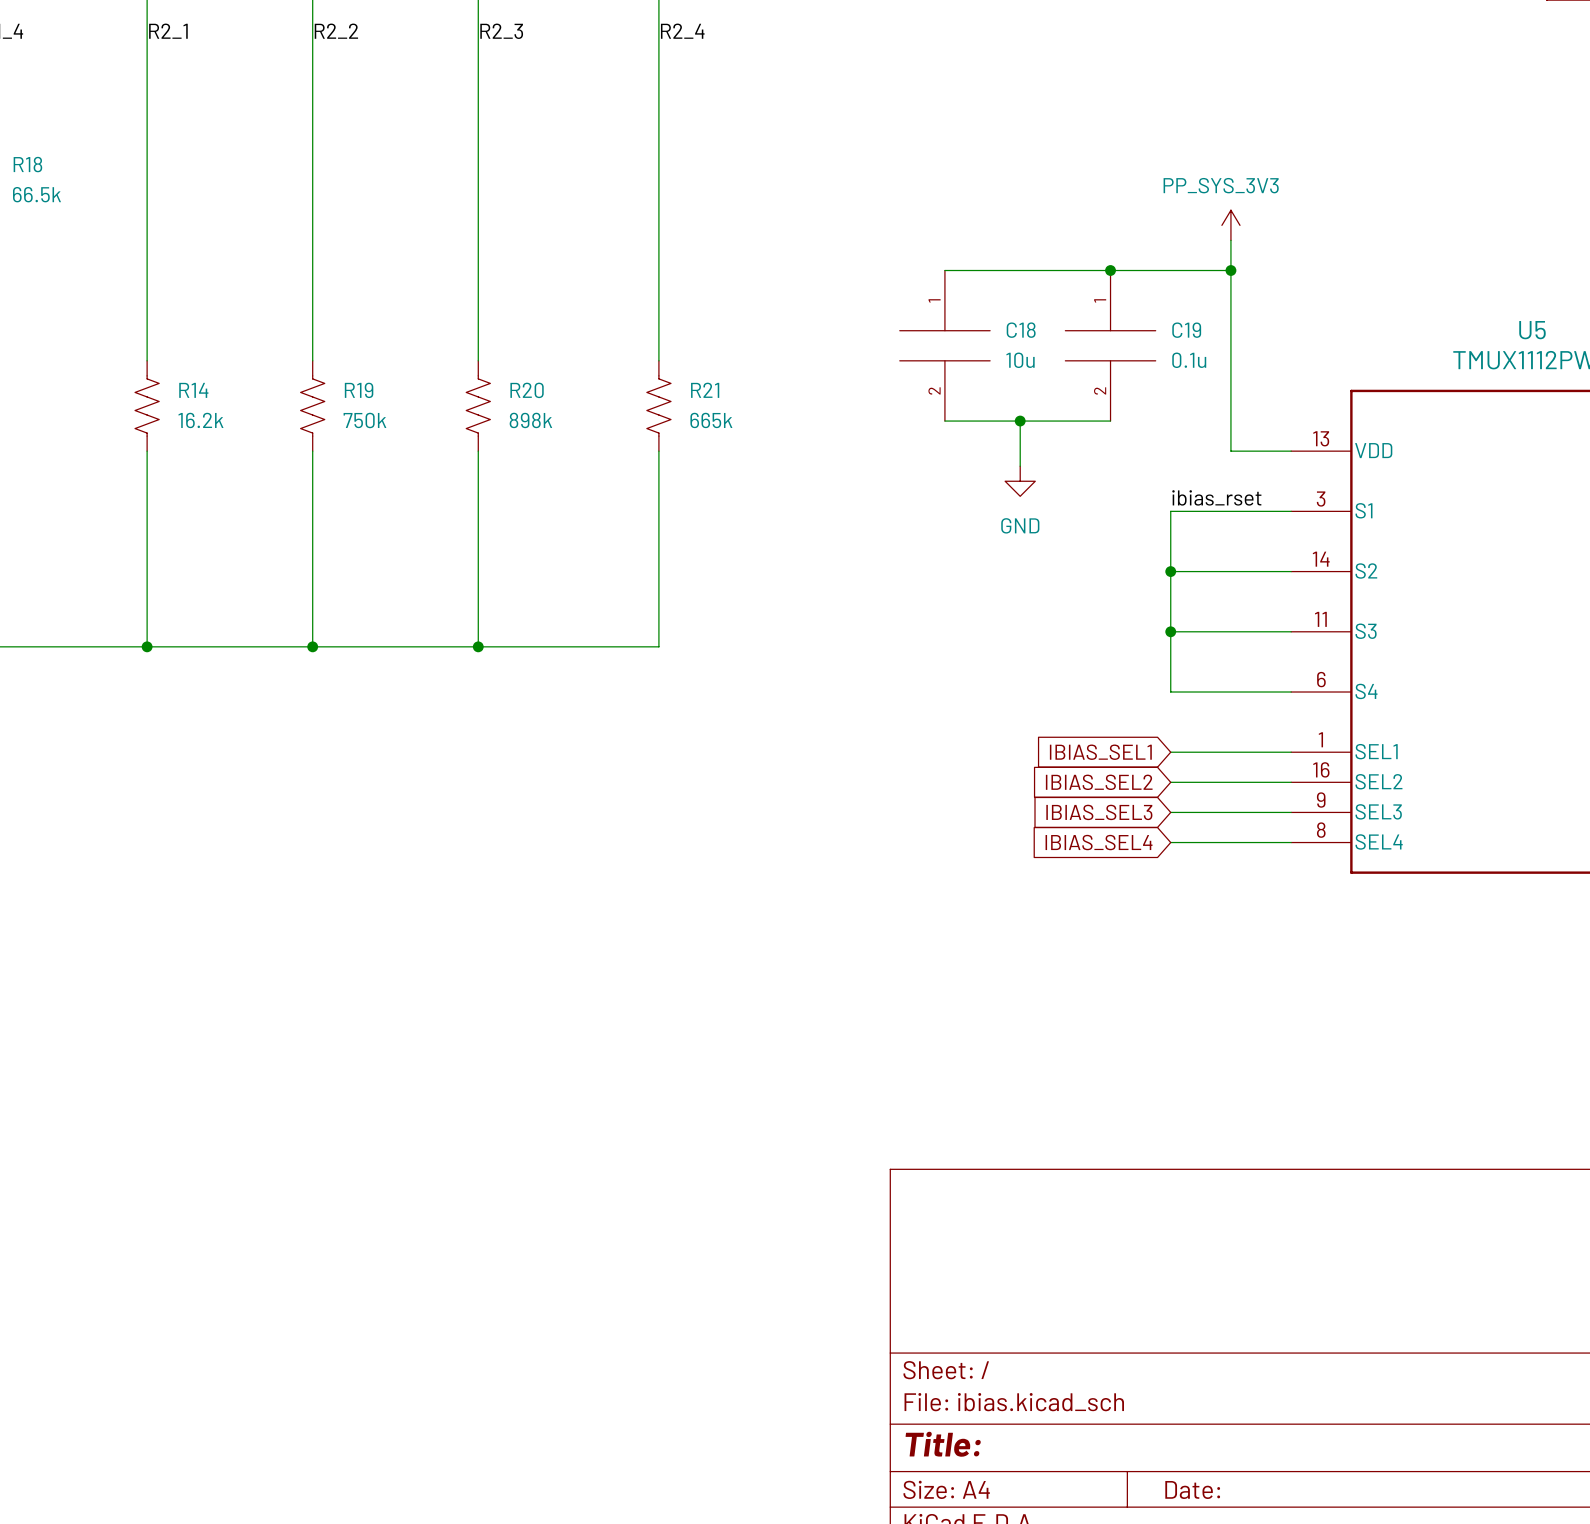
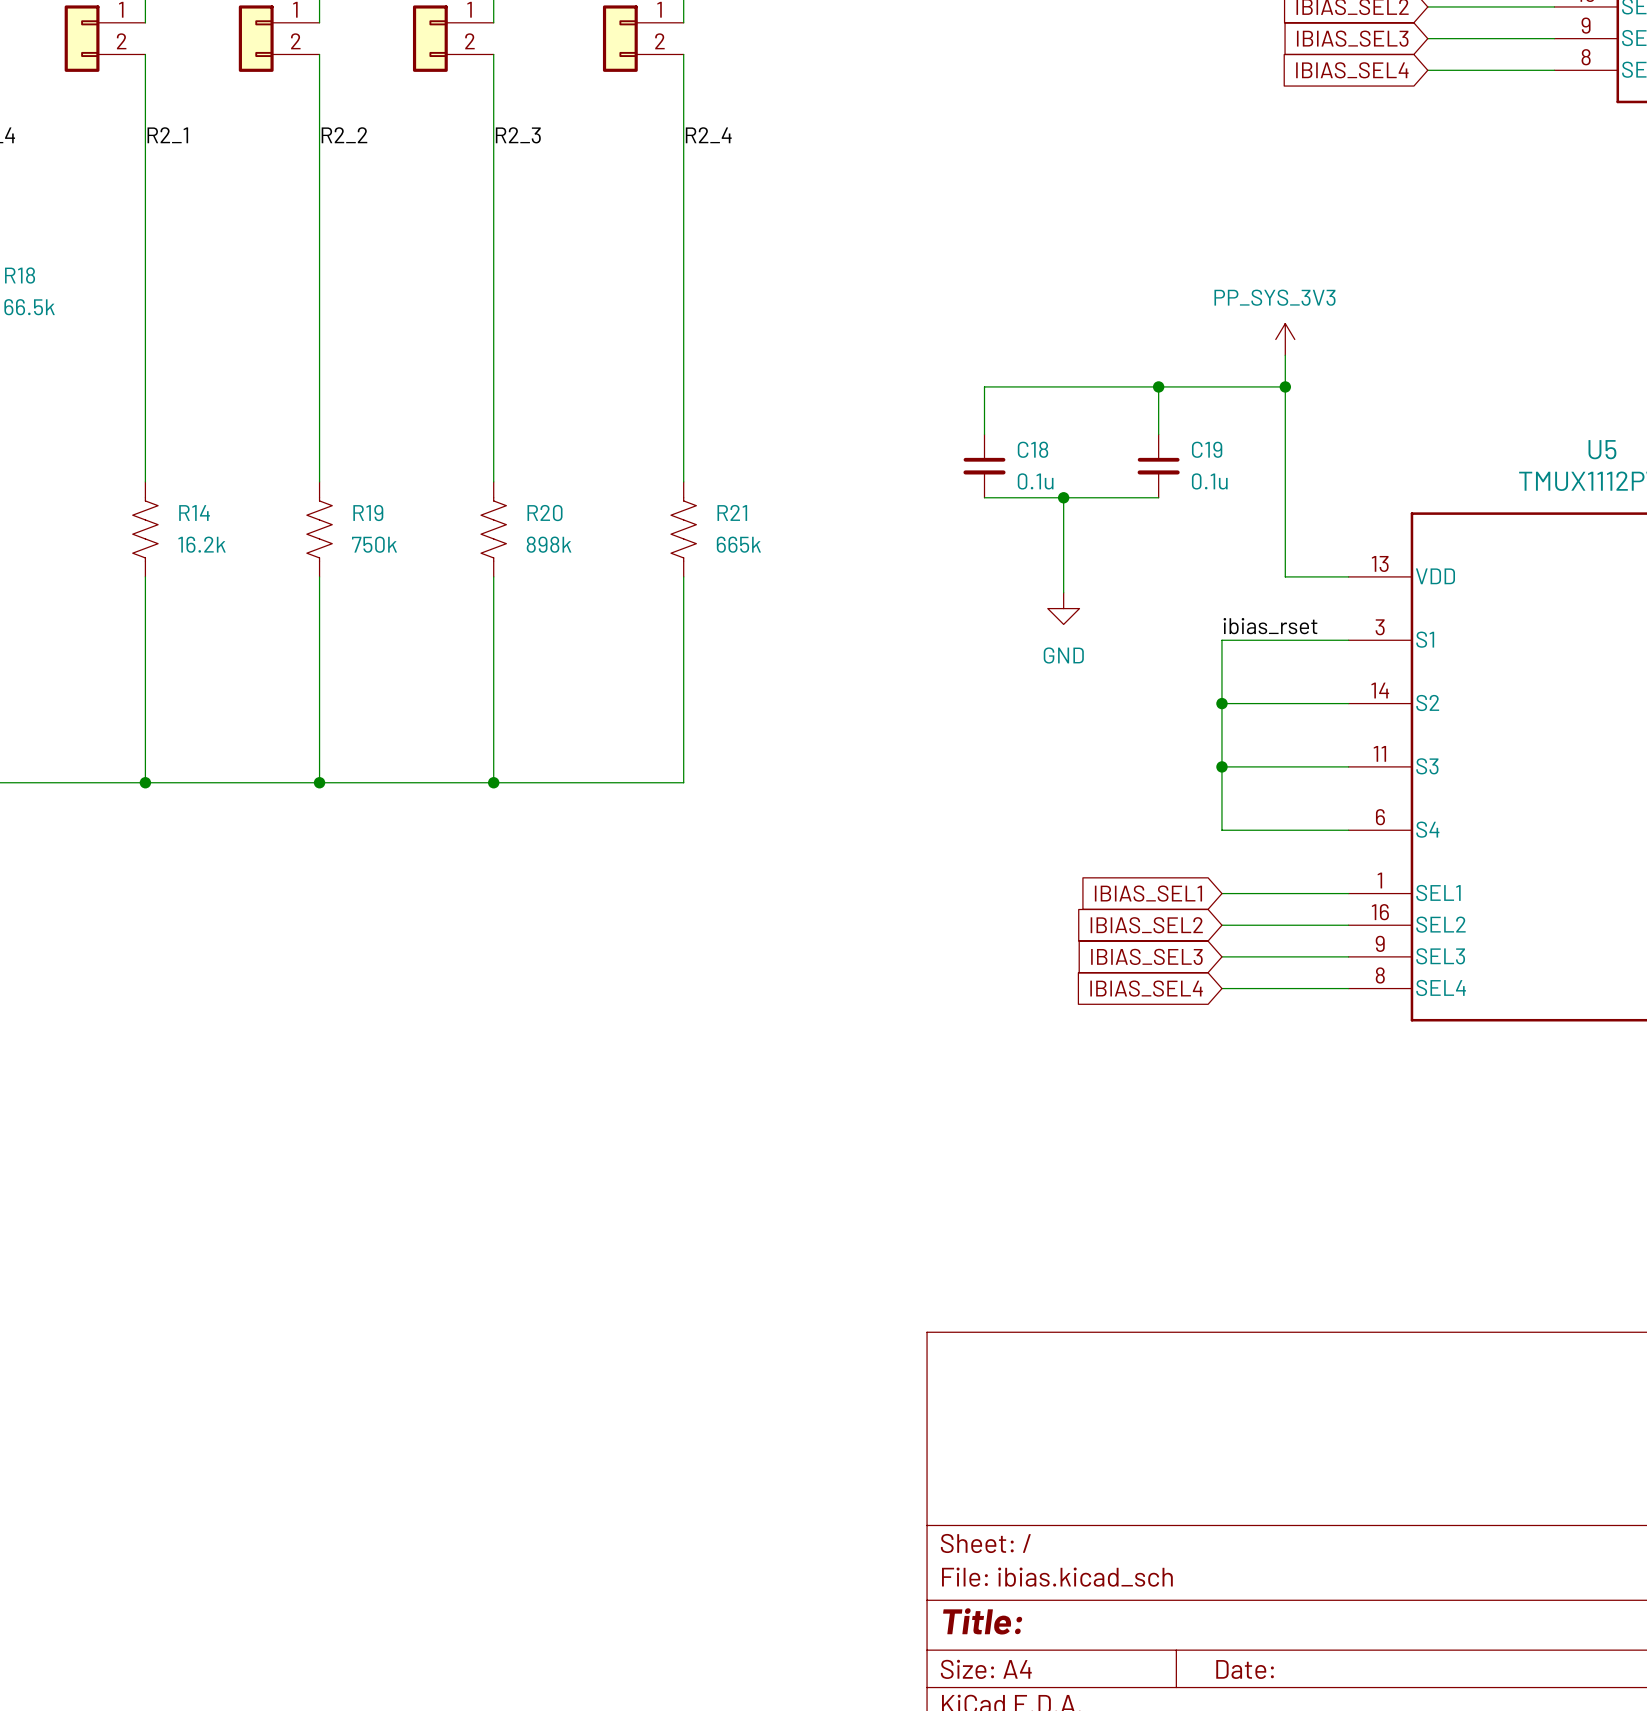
C18 symbol: [899, 270, 991, 422] -> [963, 434, 1006, 498]
C19 symbol: [1065, 270, 1156, 422] -> [1137, 434, 1180, 498]
C18 name position: C18 (1021, 330) -> C18 (1033, 449)
C19 name position: C19 (1186, 330) -> C19 (1207, 449)
C18 value: 10u (1020, 360) -> 0.1u (1035, 481)
C19 value position: 0.1u (1189, 360) -> 0.1u (1209, 481)
wire: none -> (1063, 497) (1063, 545)
wire: (944, 421) (1110, 421) -> (984, 497) (1158, 497)
junction position: (1020, 421) -> (1063, 497)

